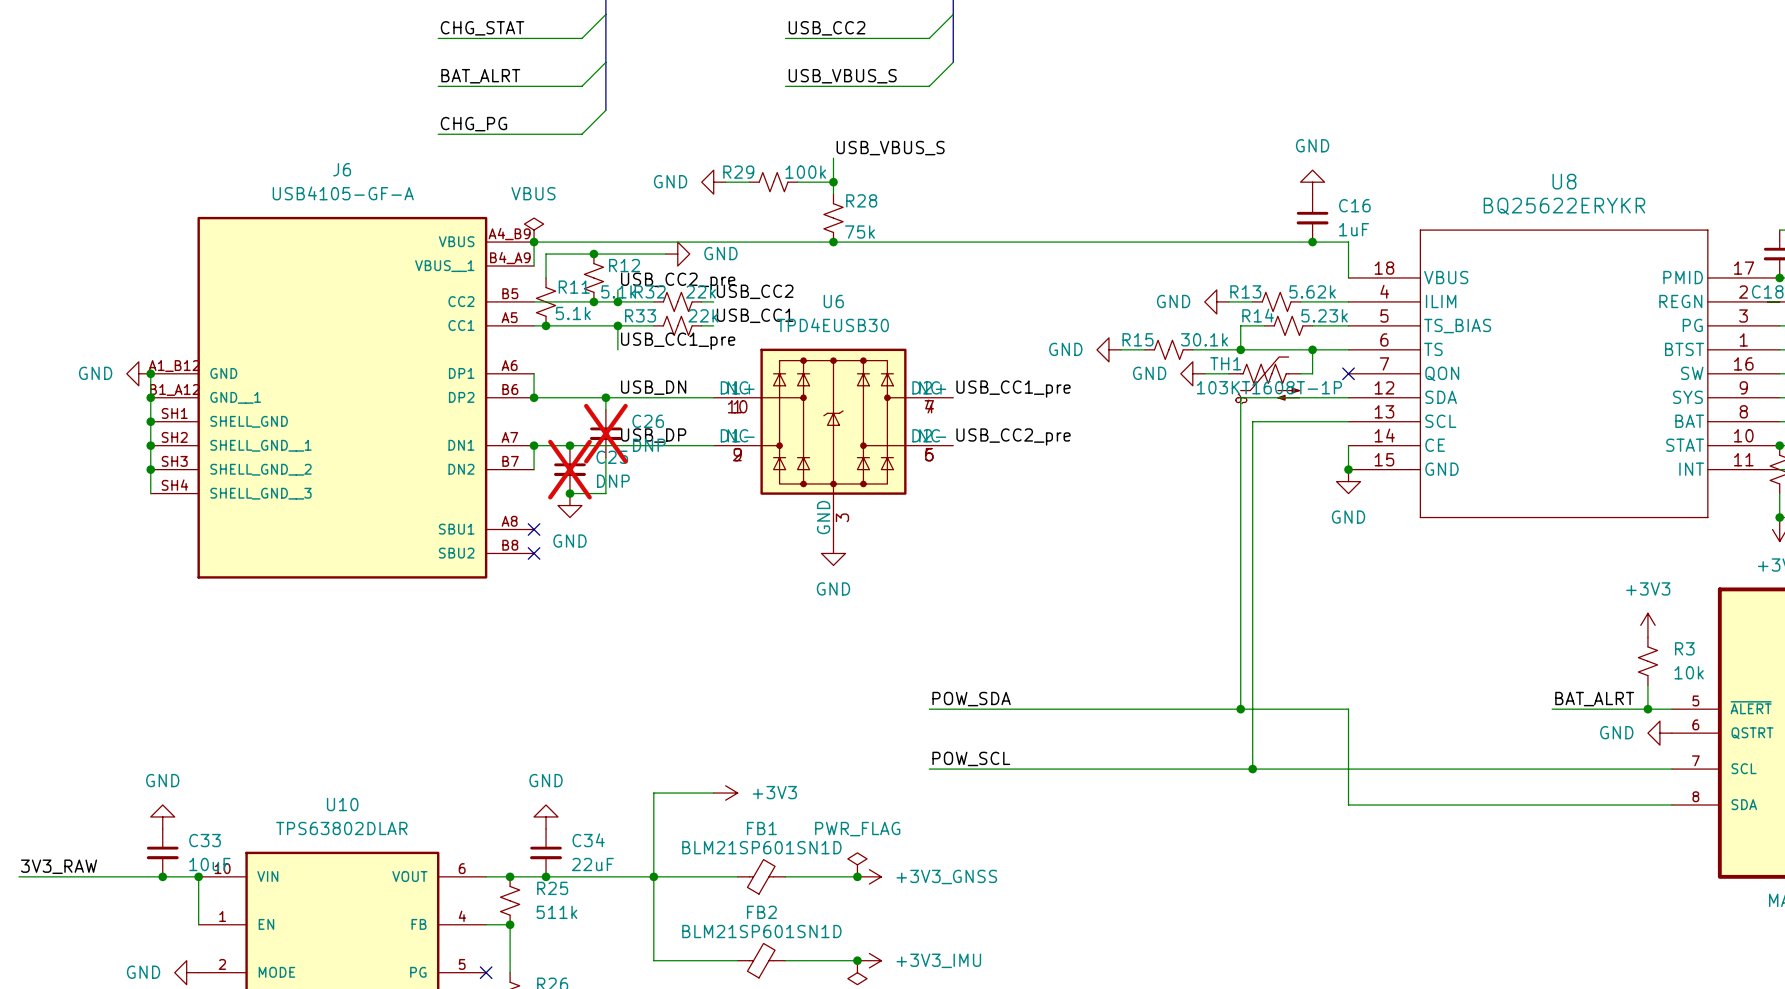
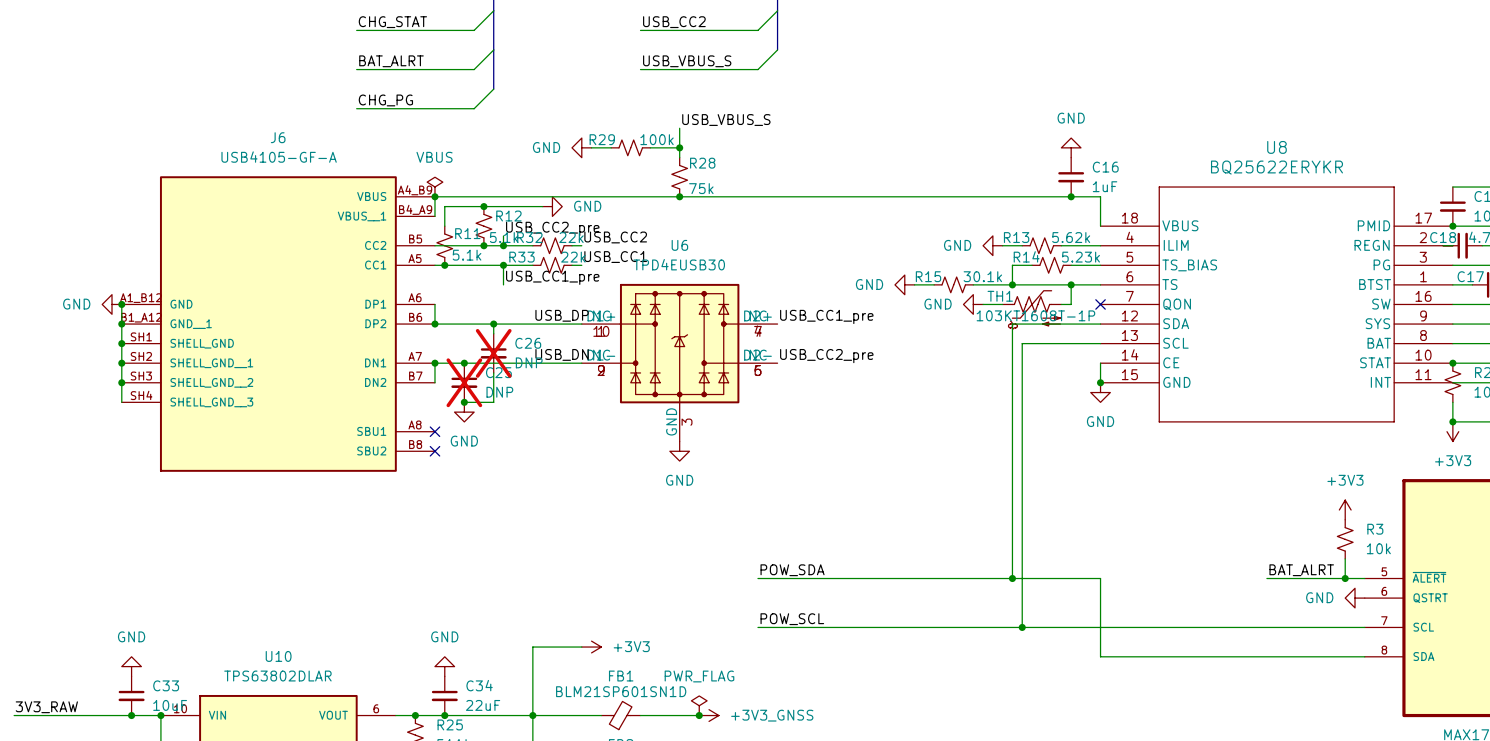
label position: USB_DN (653, 387) -> USB_DN (562, 354)
label position: USB_DP (653, 435) -> USB_DP (562, 315)

